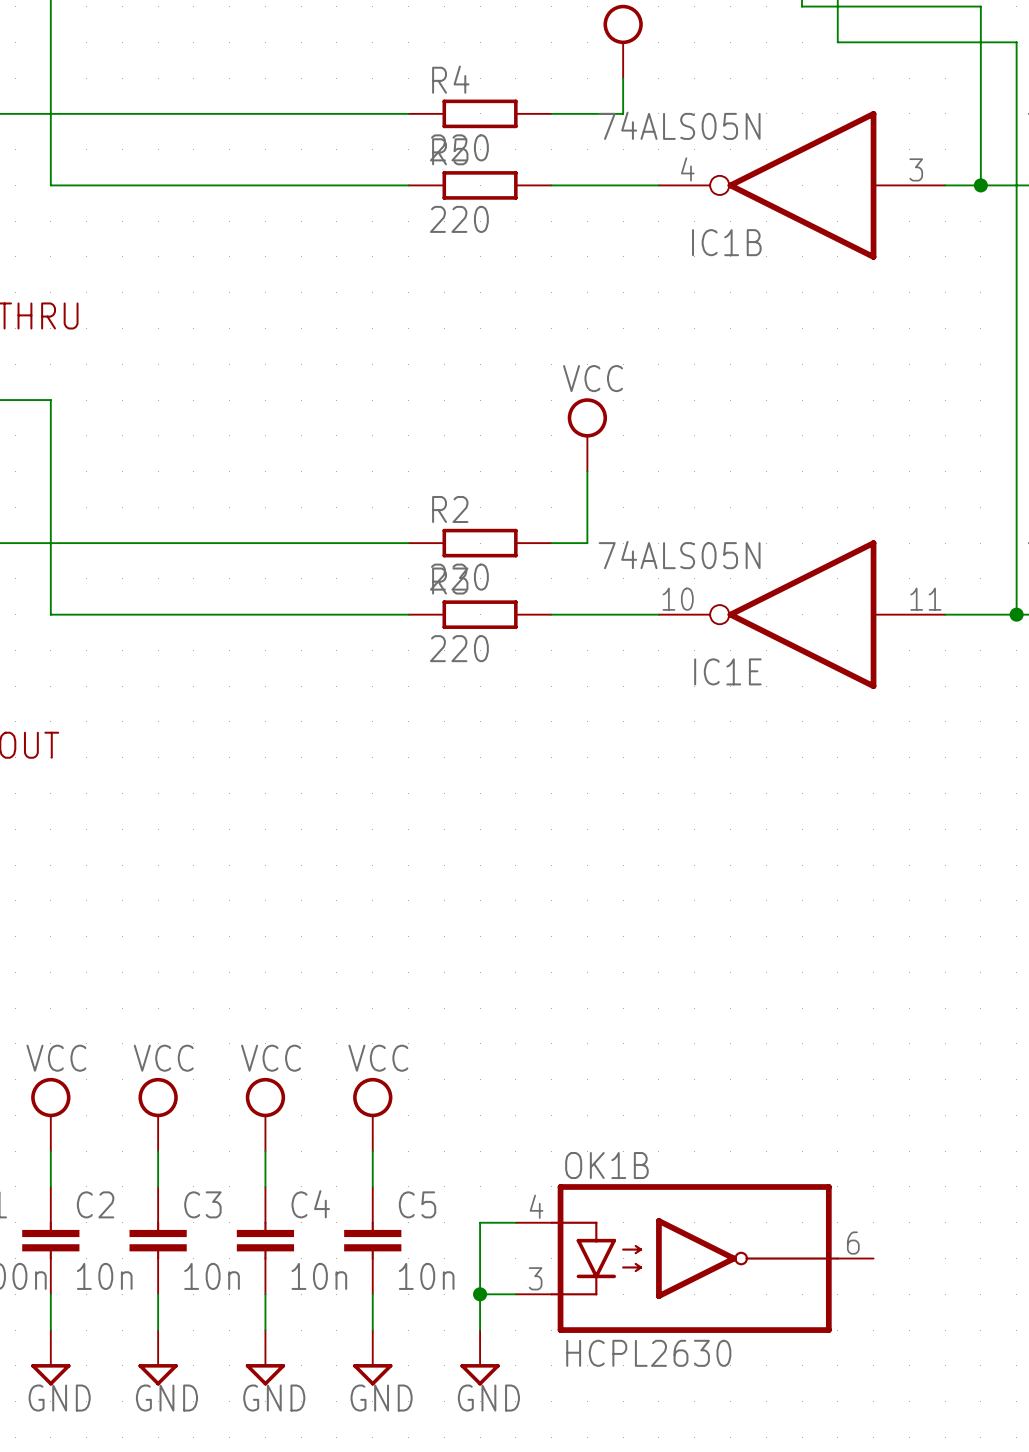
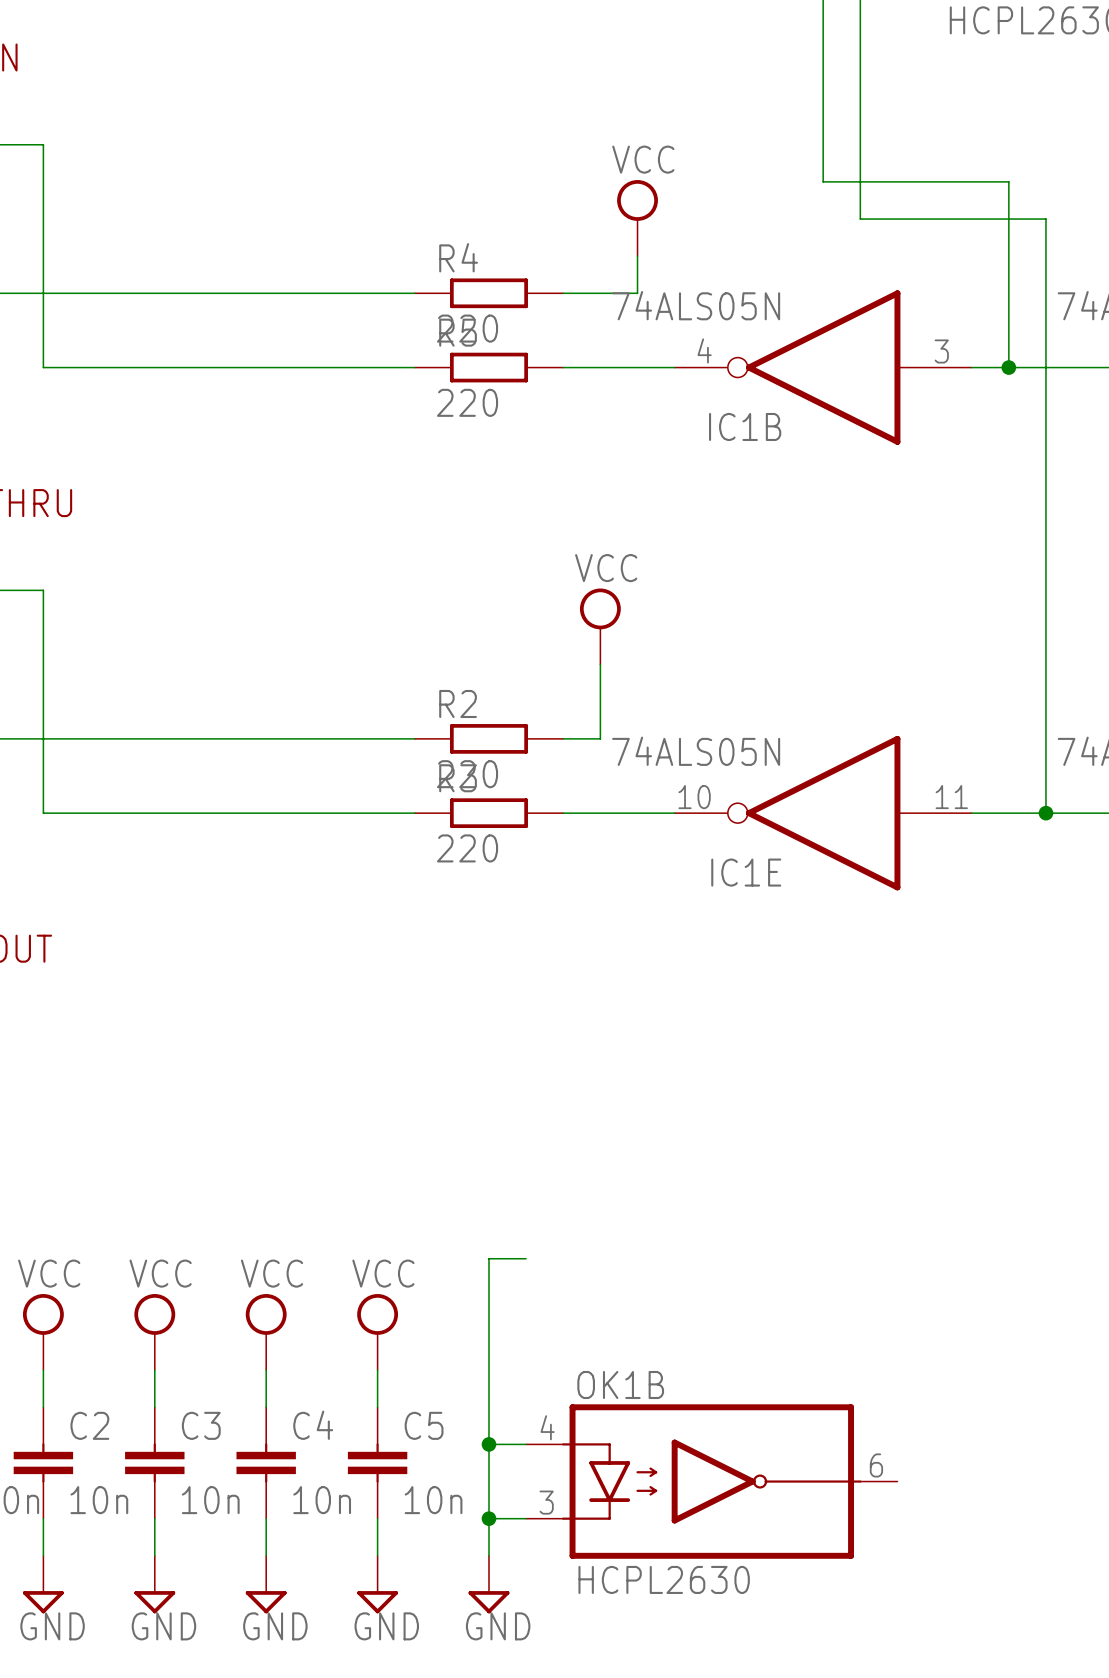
wire: none -> (526, 1258) (488, 1258) (488, 1444)
junction: none -> (488, 1444)

